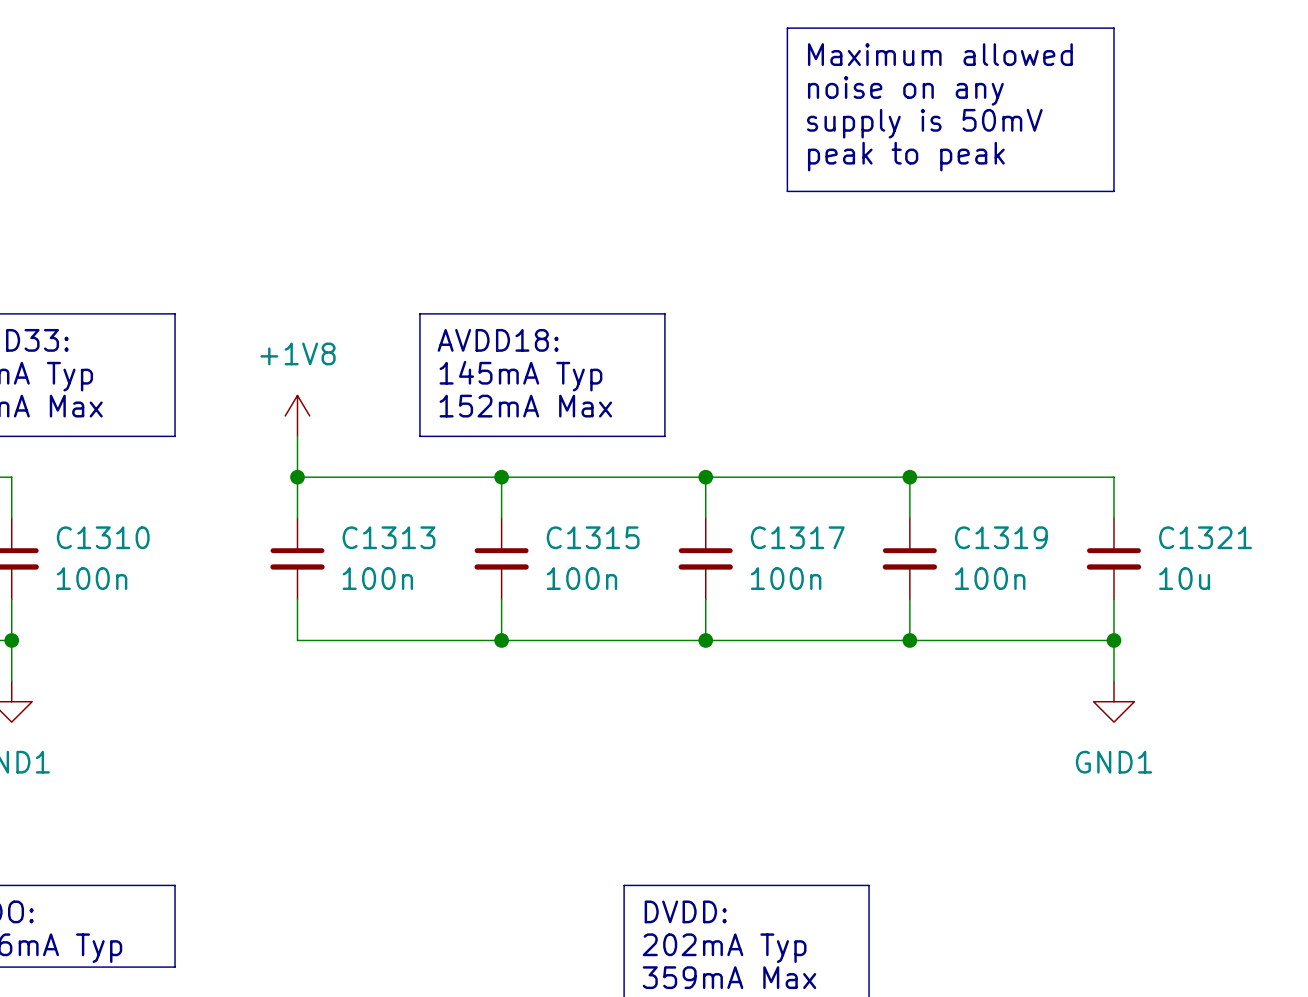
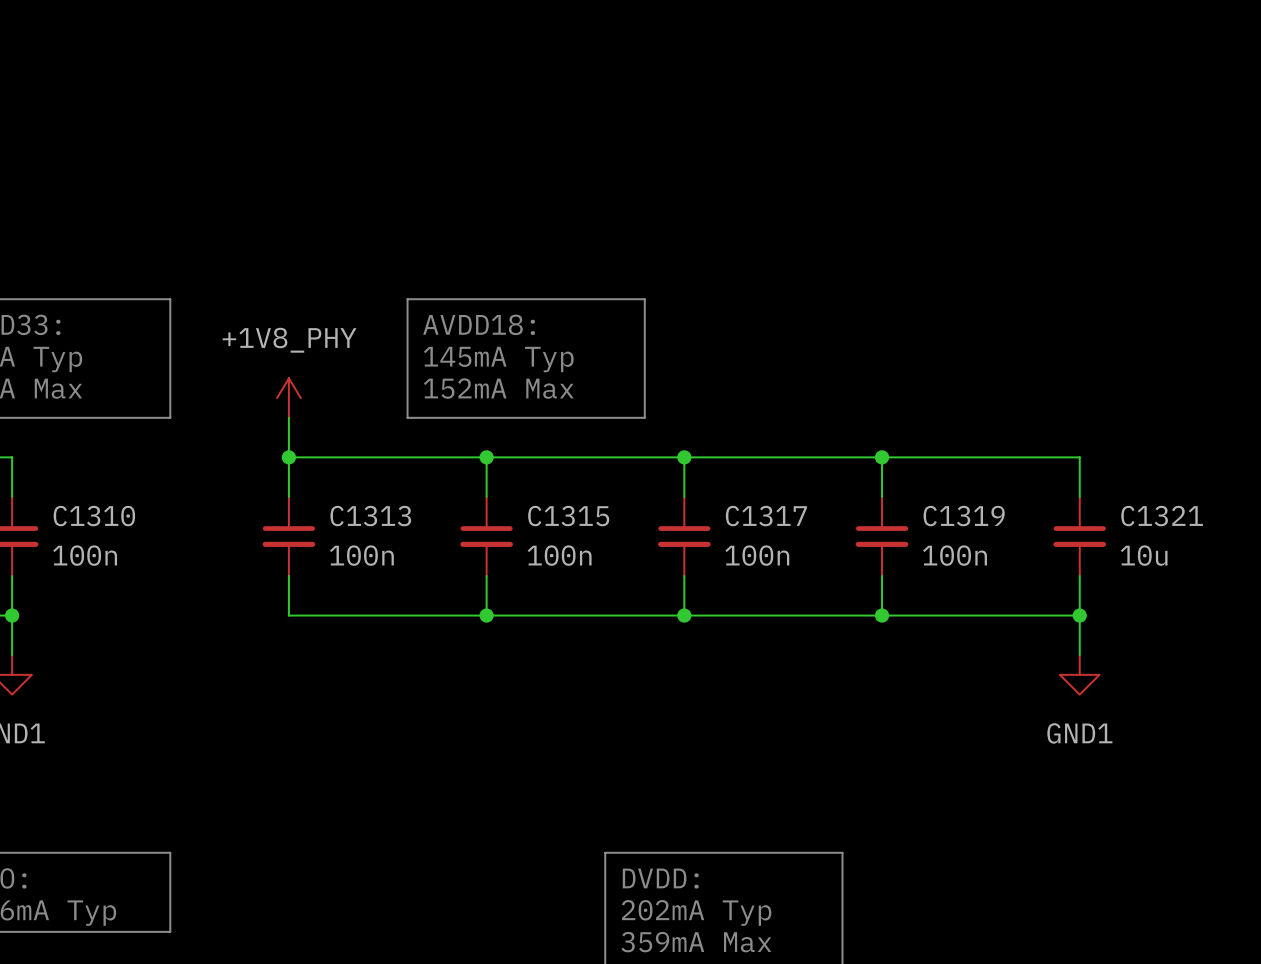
line: (787, 28) (1113, 28) (1113, 191) (787, 191) (787, 28) -> none
text: Maximum allowed (940, 54) -> none
text: noise on any (905, 90) -> none
text: supply is 50mV (924, 123) -> none
text: peak to peak (906, 156) -> none
power symbol: +1V8 (297, 415) -> +1V8_PHY (288, 398)

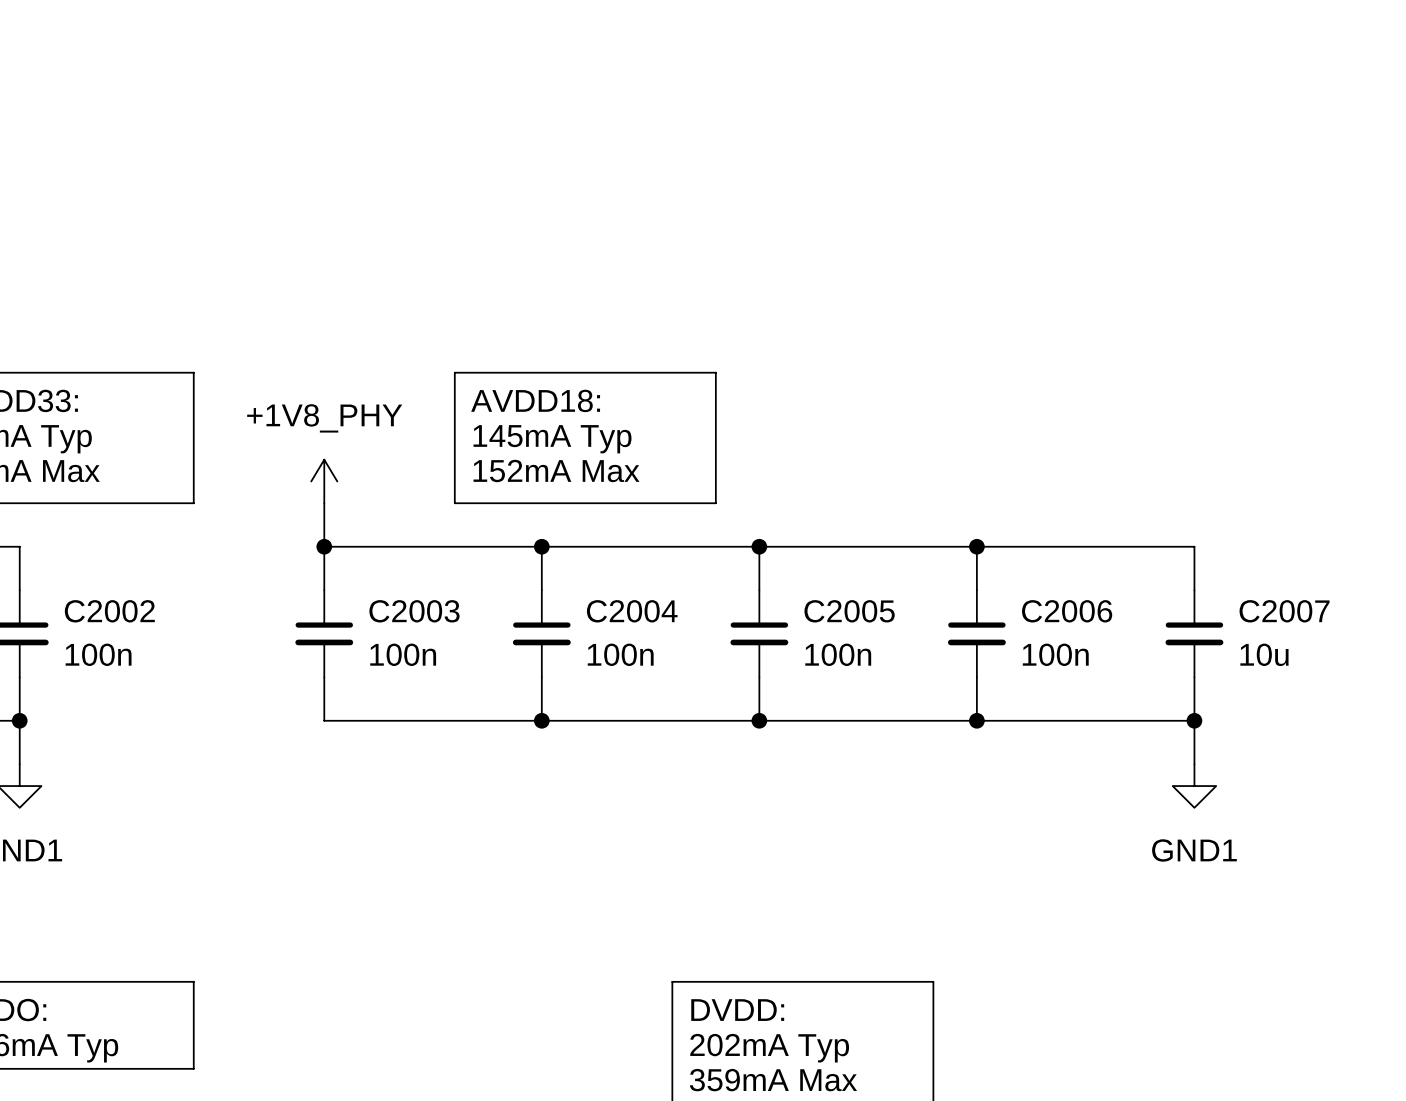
C1310 name: C1310 (94, 516) -> C2002 (109, 611)
C1313 name: C1313 (370, 516) -> C2003 (414, 611)
C1315 name: C1315 (568, 516) -> C2004 (632, 611)
C1317 name: C1317 (766, 516) -> C2005 (849, 611)
C1319 name: C1319 (964, 516) -> C2006 (1067, 611)
C1321 name: C1321 (1162, 516) -> C2007 (1284, 611)

